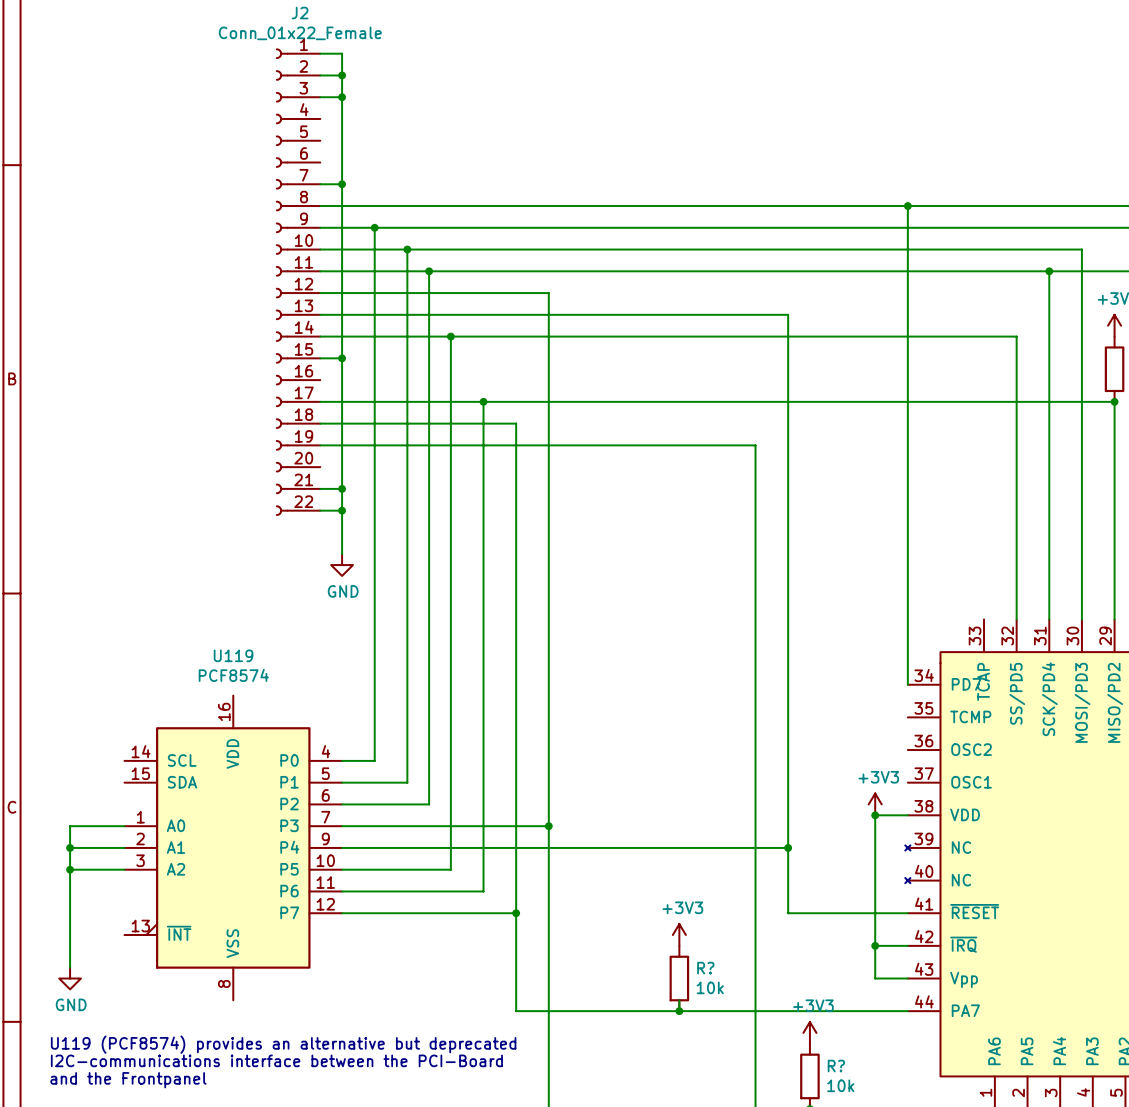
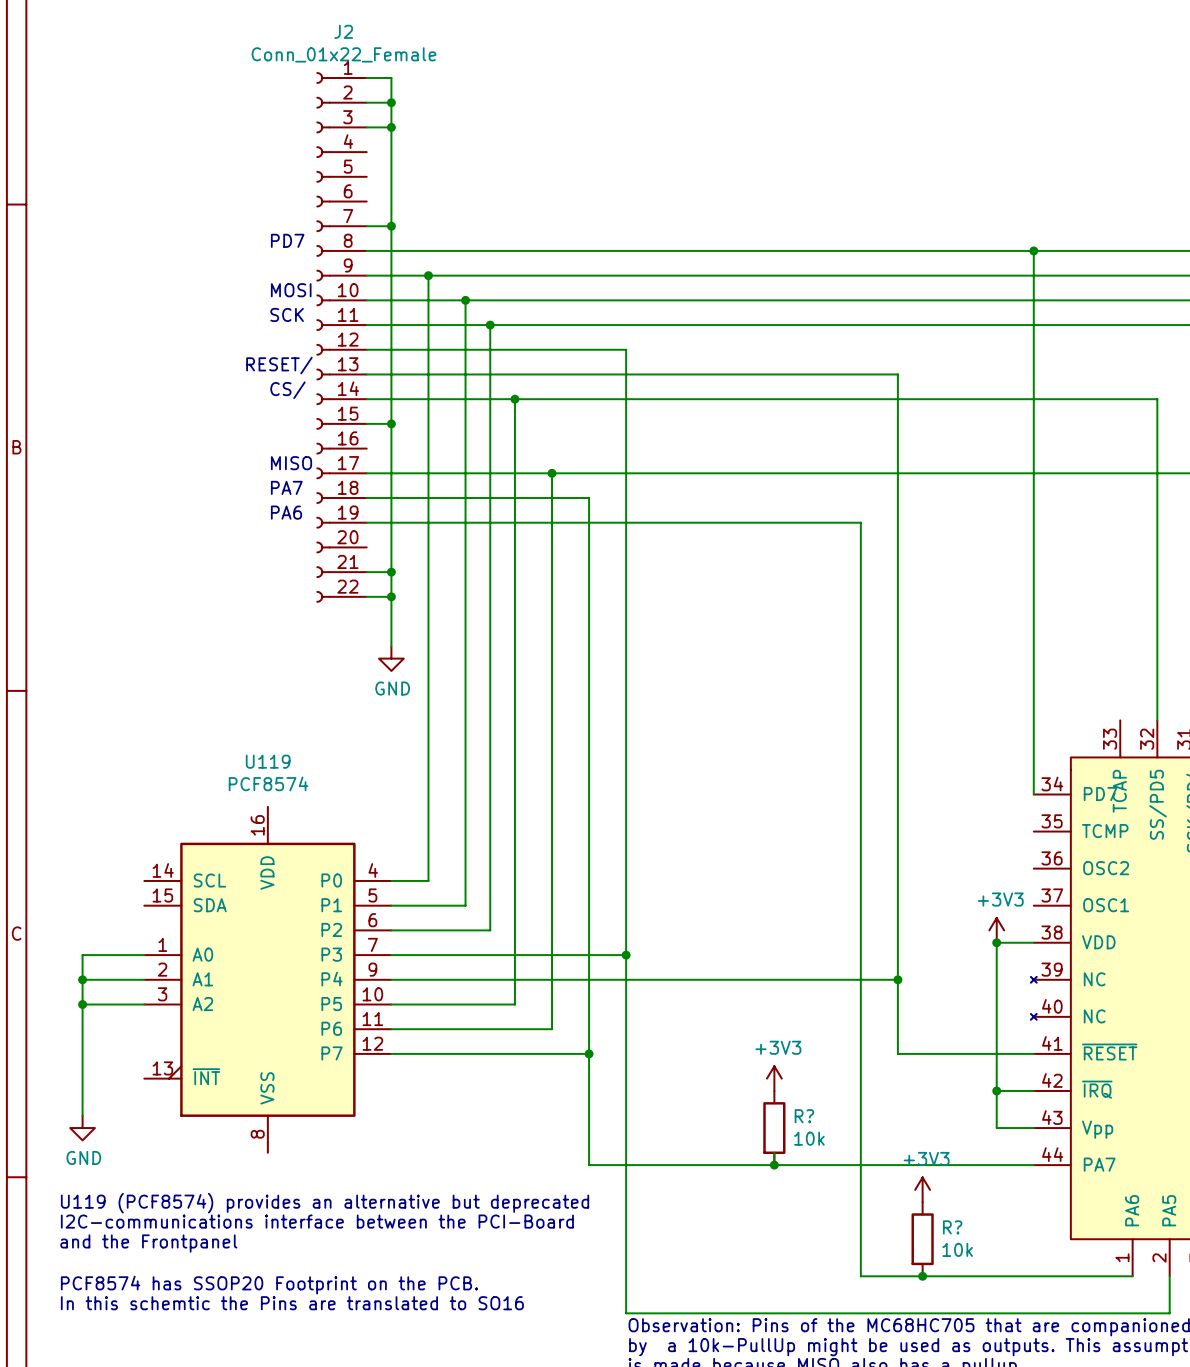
text: none -> PD7 (287, 240)
text: none -> MOSI (291, 290)
text: none -> SCK (287, 314)
text: none -> RESET/ (279, 365)
text: none -> CS/ (287, 390)
text: none -> MISO (291, 463)
text: none -> PA7 (286, 487)
text: none -> PA6 (286, 512)

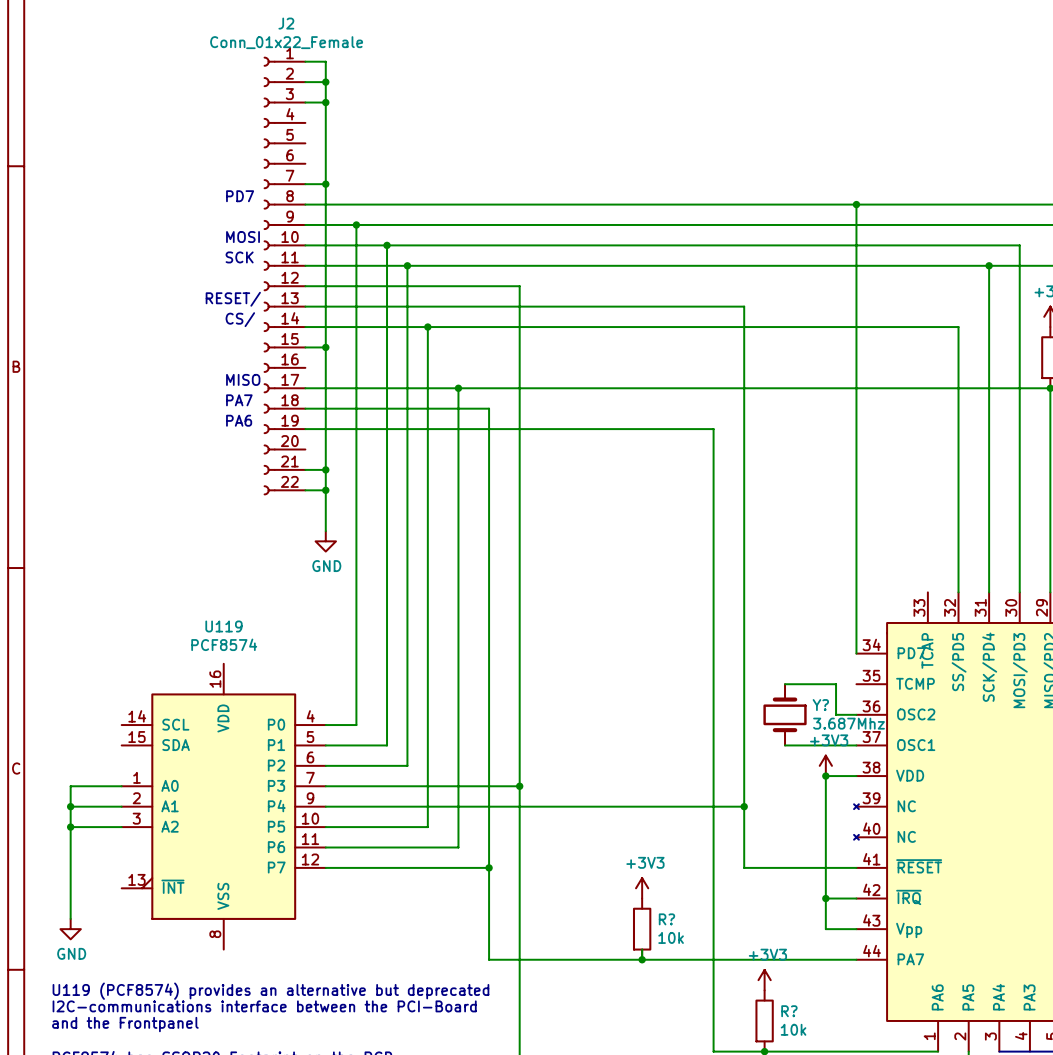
wire: none -> (785, 684) (836, 684) (836, 714) (856, 714)
Y?: none -> 3.687Mhz (785, 714)
wire: none -> (785, 745) (856, 745)

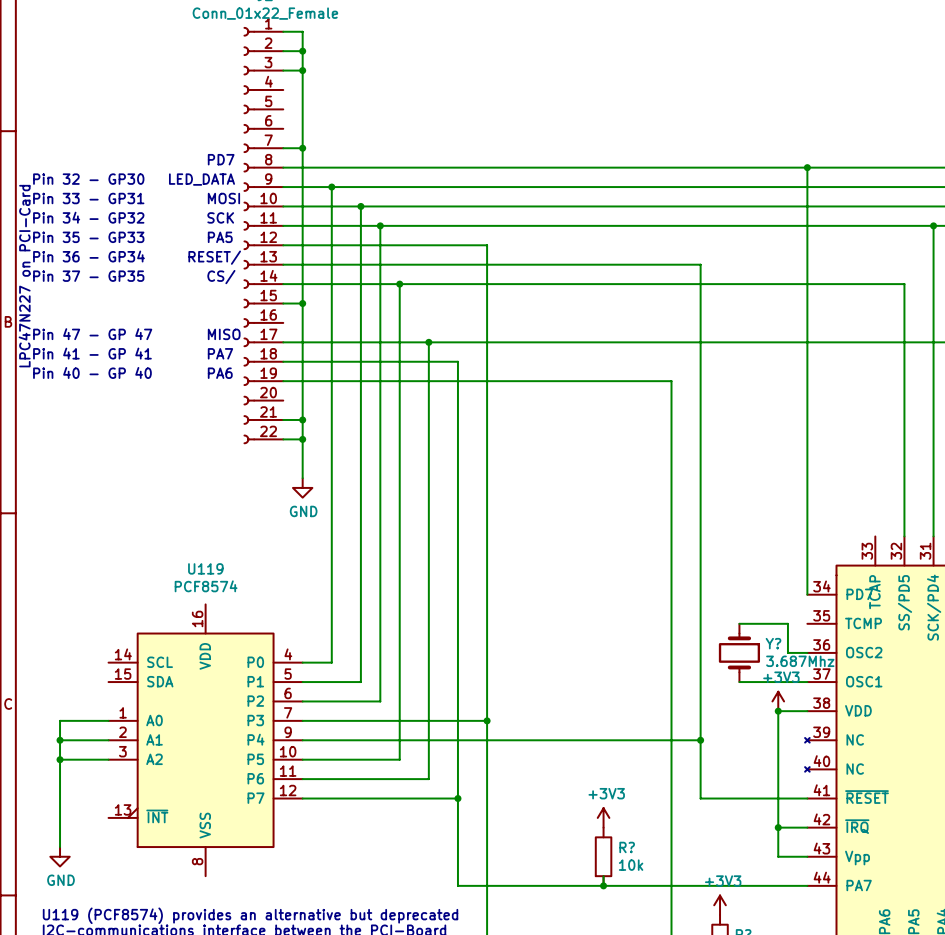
text: none -> Pin 32 - GP30 (88, 179)
text: none -> LED_DATA (201, 179)
text: none -> Pin 33 - GP31 (88, 198)
text: none -> Pin 34 - GP32 (88, 217)
text: none -> Pin 35 - GP33 (88, 237)
text: none -> PA5 (220, 237)
text: none -> Pin 36 - GP34 (88, 256)
text: none -> LPC47N227 on PCI-Card (24, 276)
text: none -> Pin 37 - GP35 (88, 276)
text: none -> Pin 47 - GP 47 (92, 334)
text: none -> Pin 41 - GP 41 (92, 353)
text: none -> Pin 40 - GP 40 (92, 372)

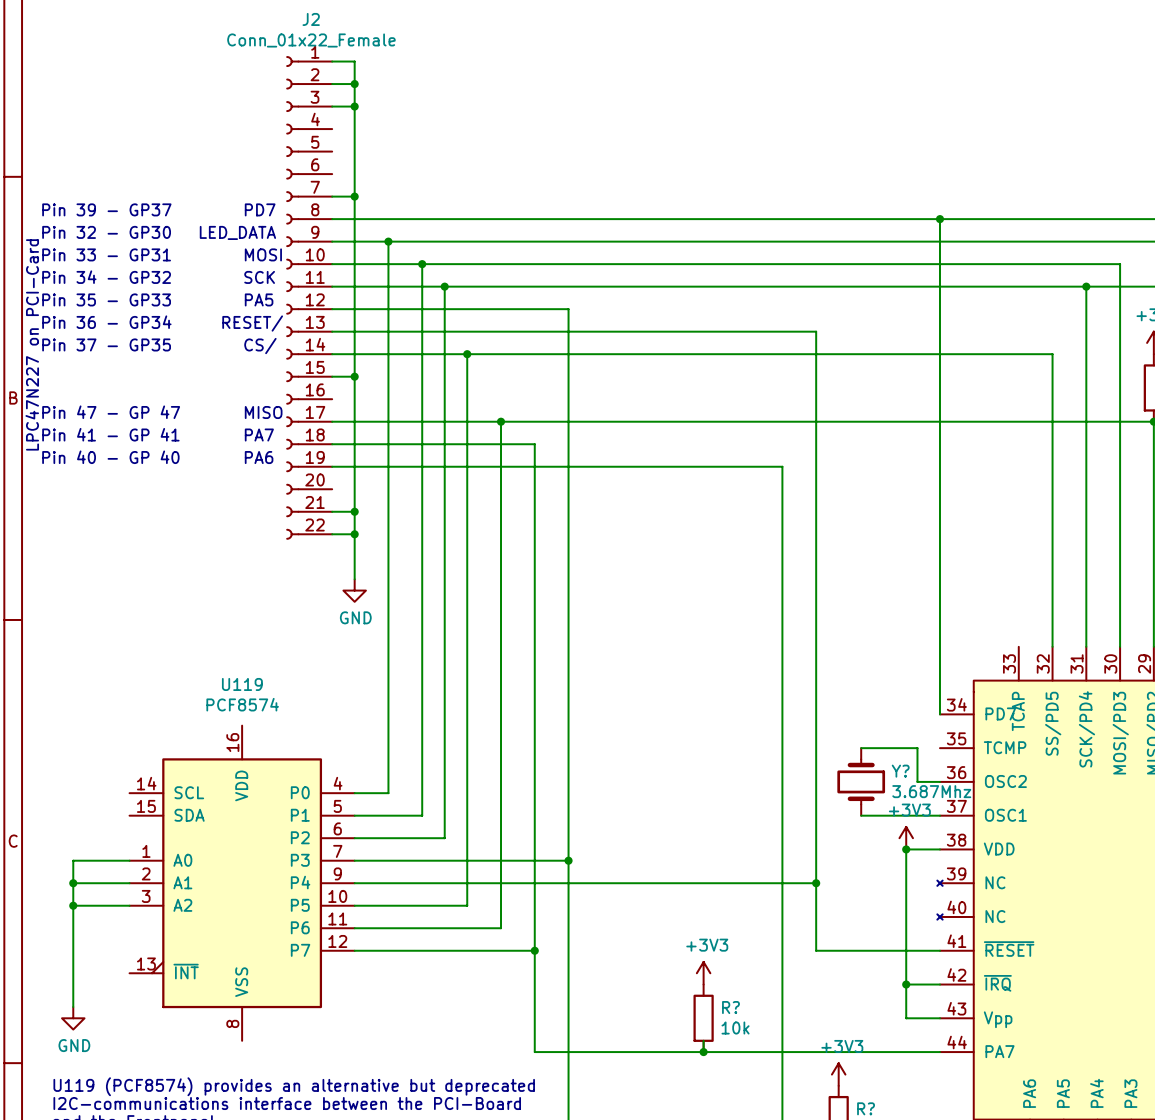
text: none -> Pin 39 - GP37 (106, 209)

